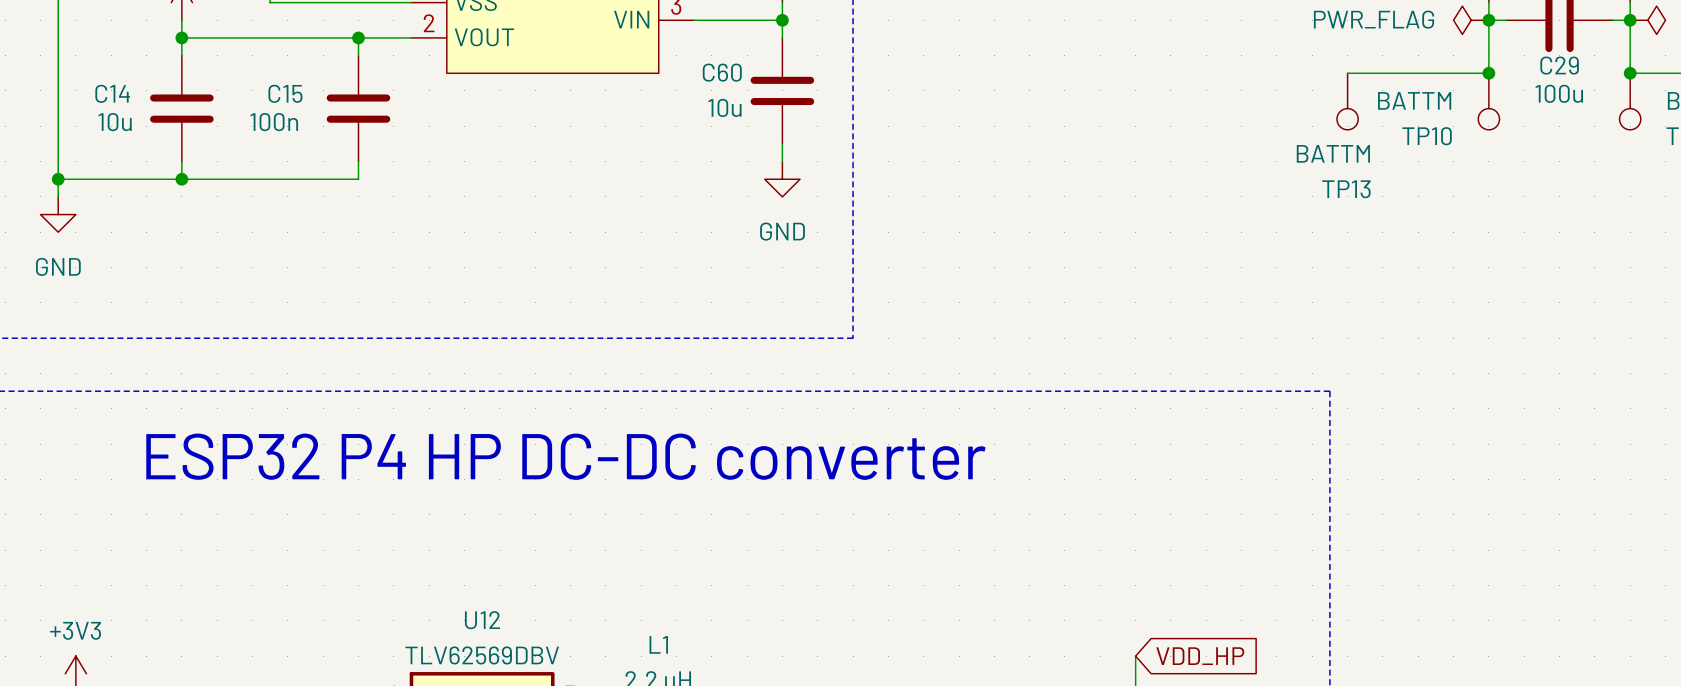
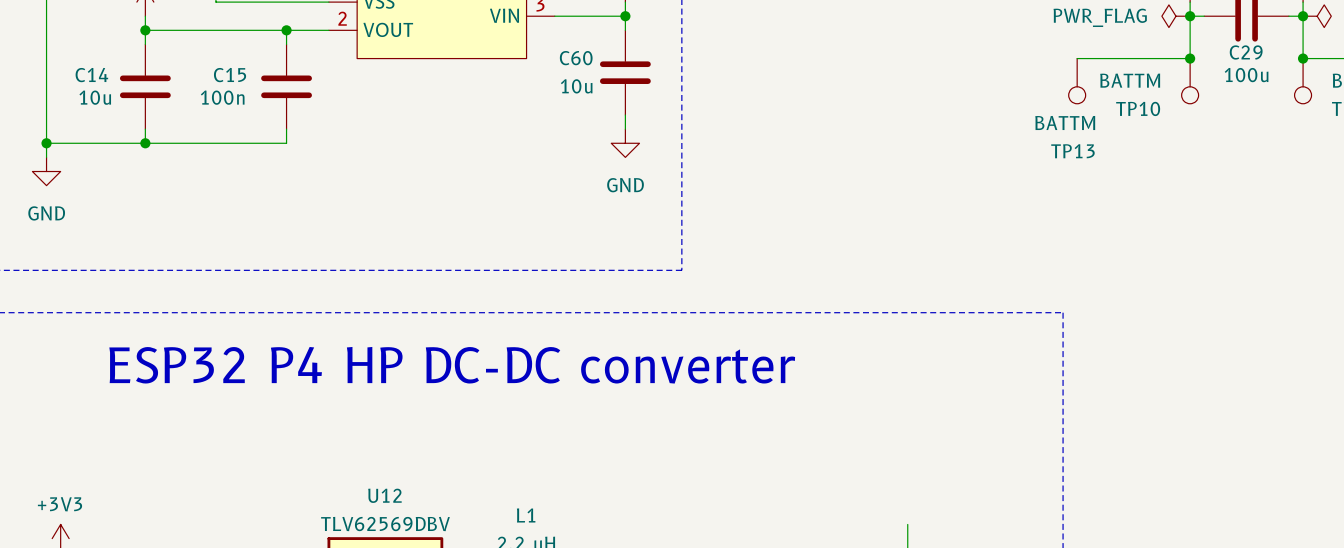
global label: VDD_HP (1200, 656) -> none

